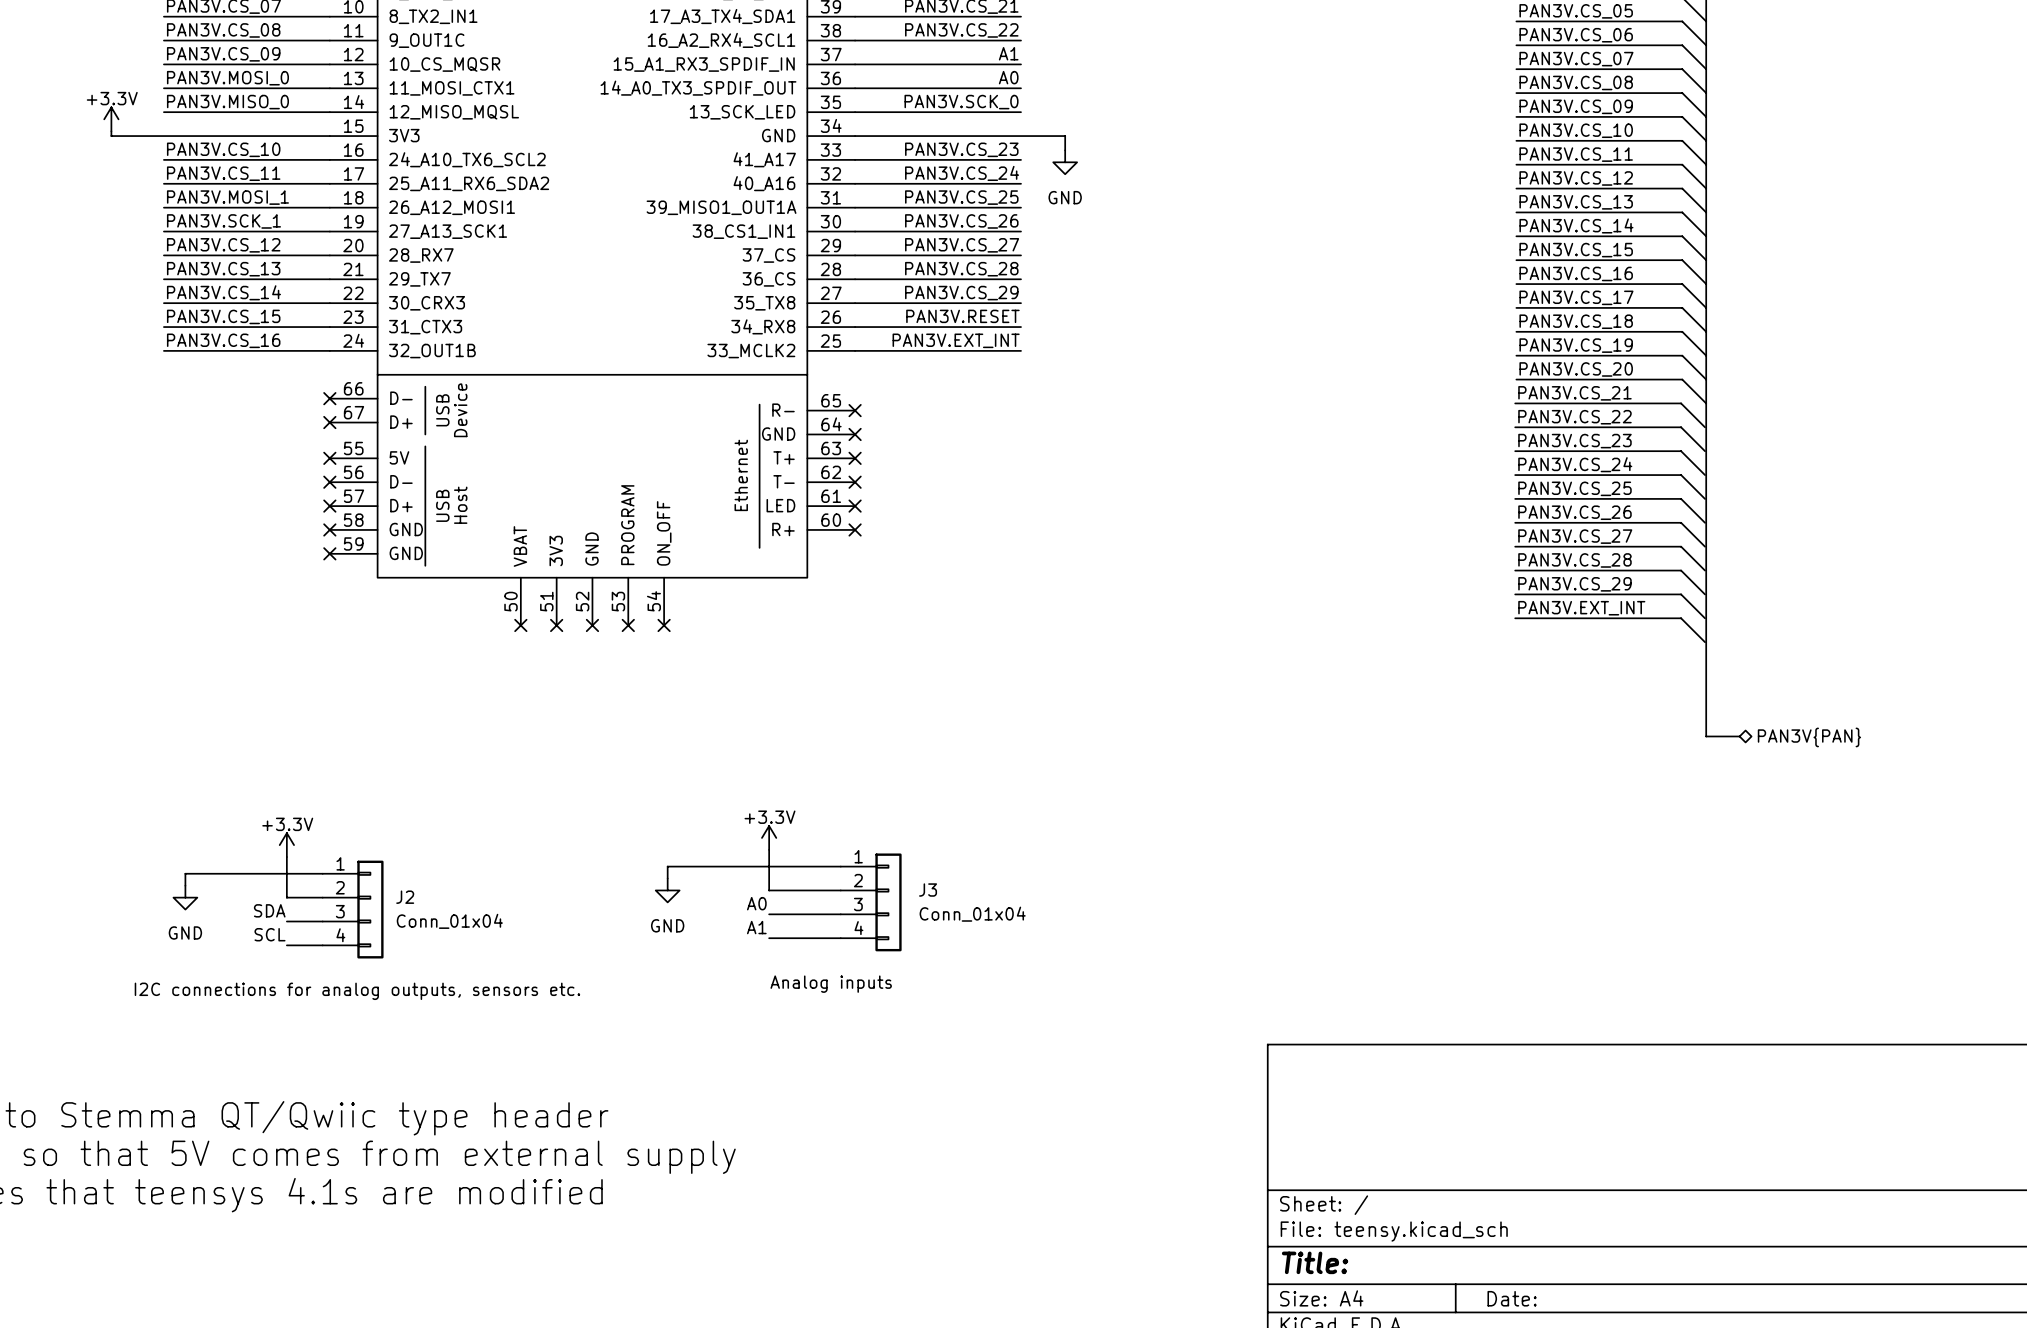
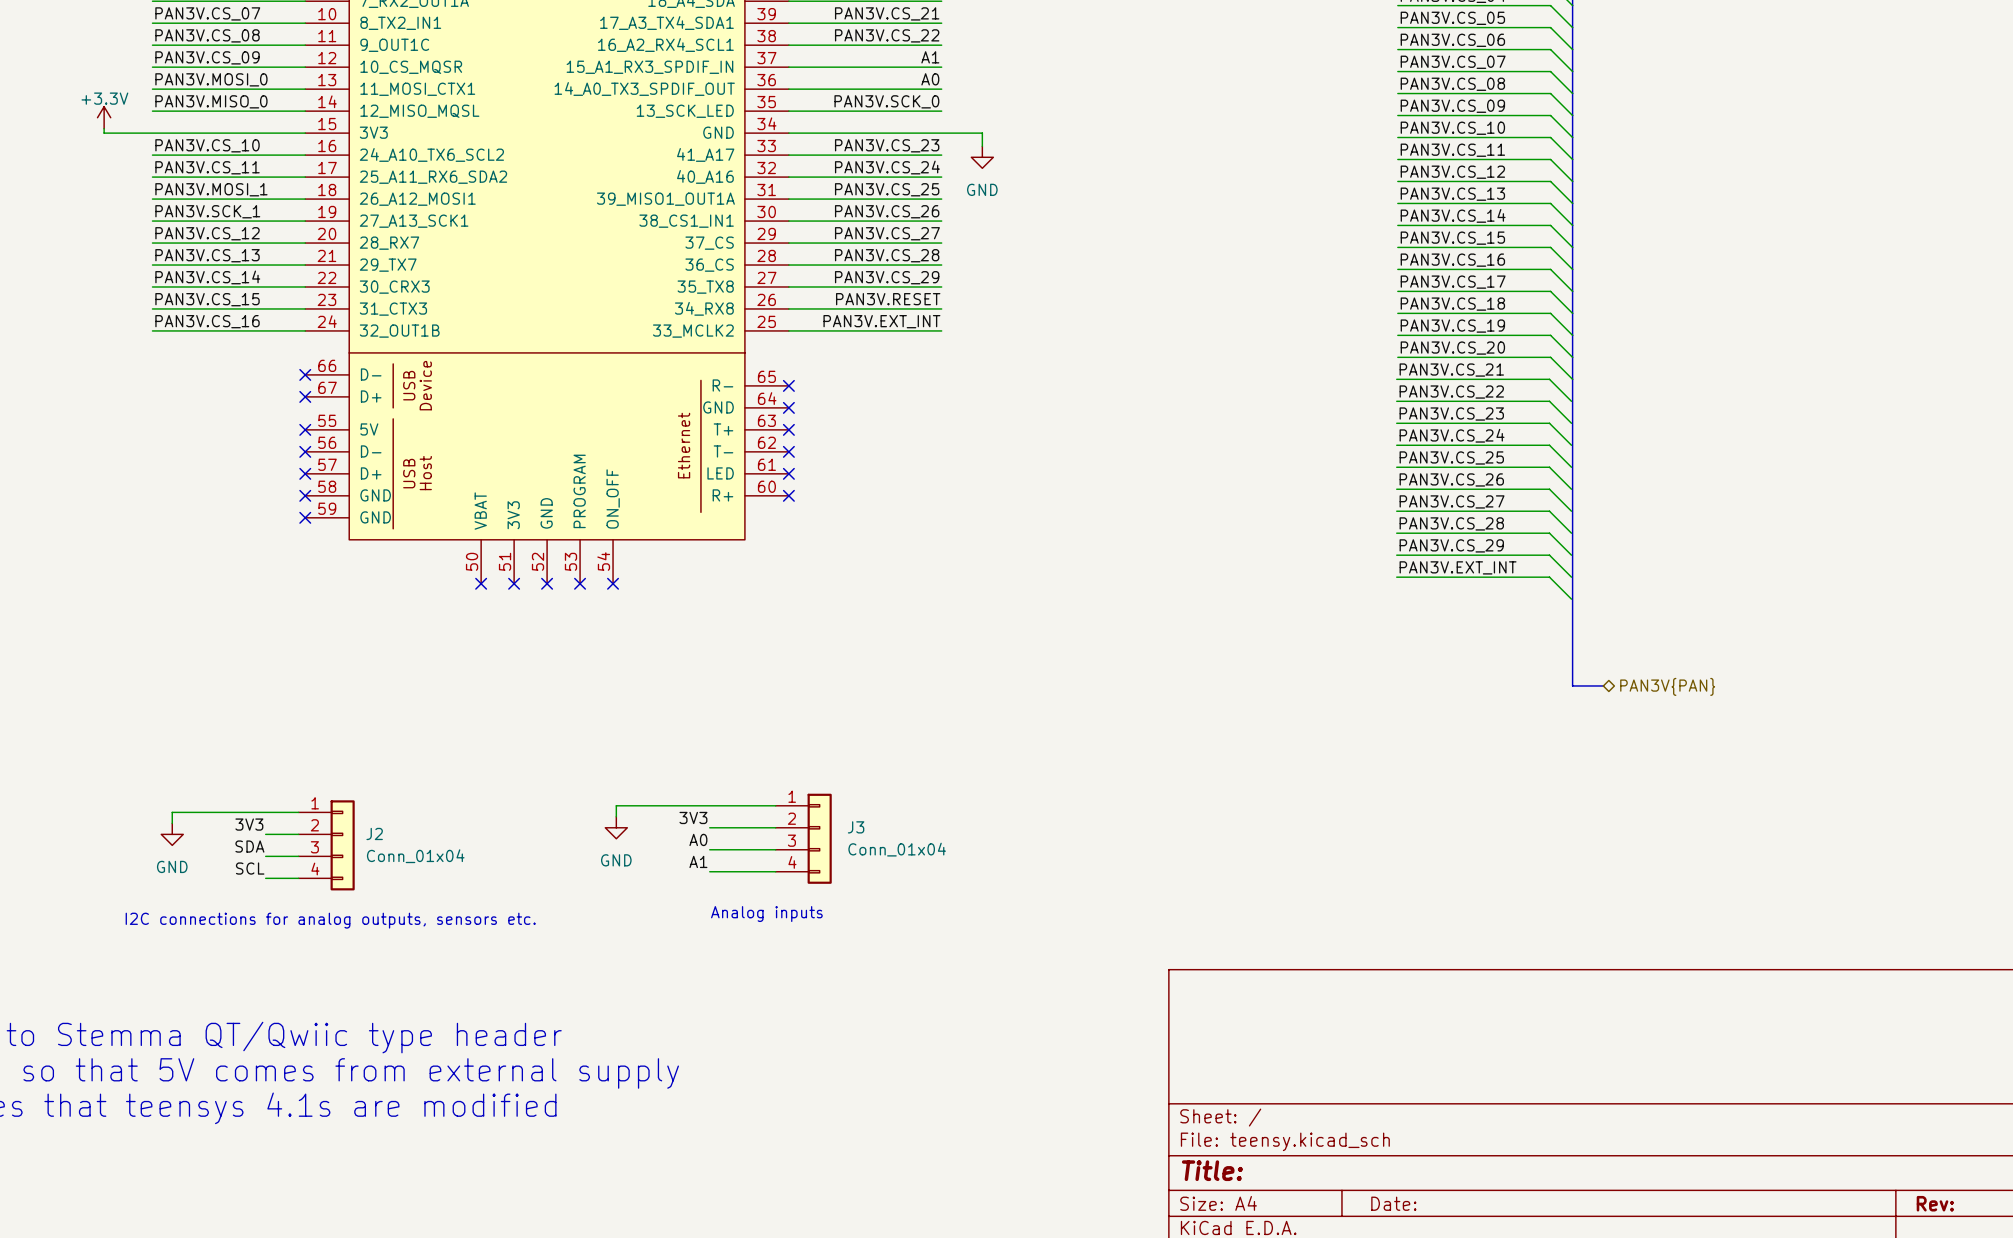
power symbol: +3.3V (769, 837) -> none
power symbol: +3.3V (286, 845) -> none
wire: (769, 849) (769, 890) -> none
wire: (286, 857) (286, 897) -> none
label: none -> 3V3 (693, 817)
label: none -> 3V3 (249, 824)

